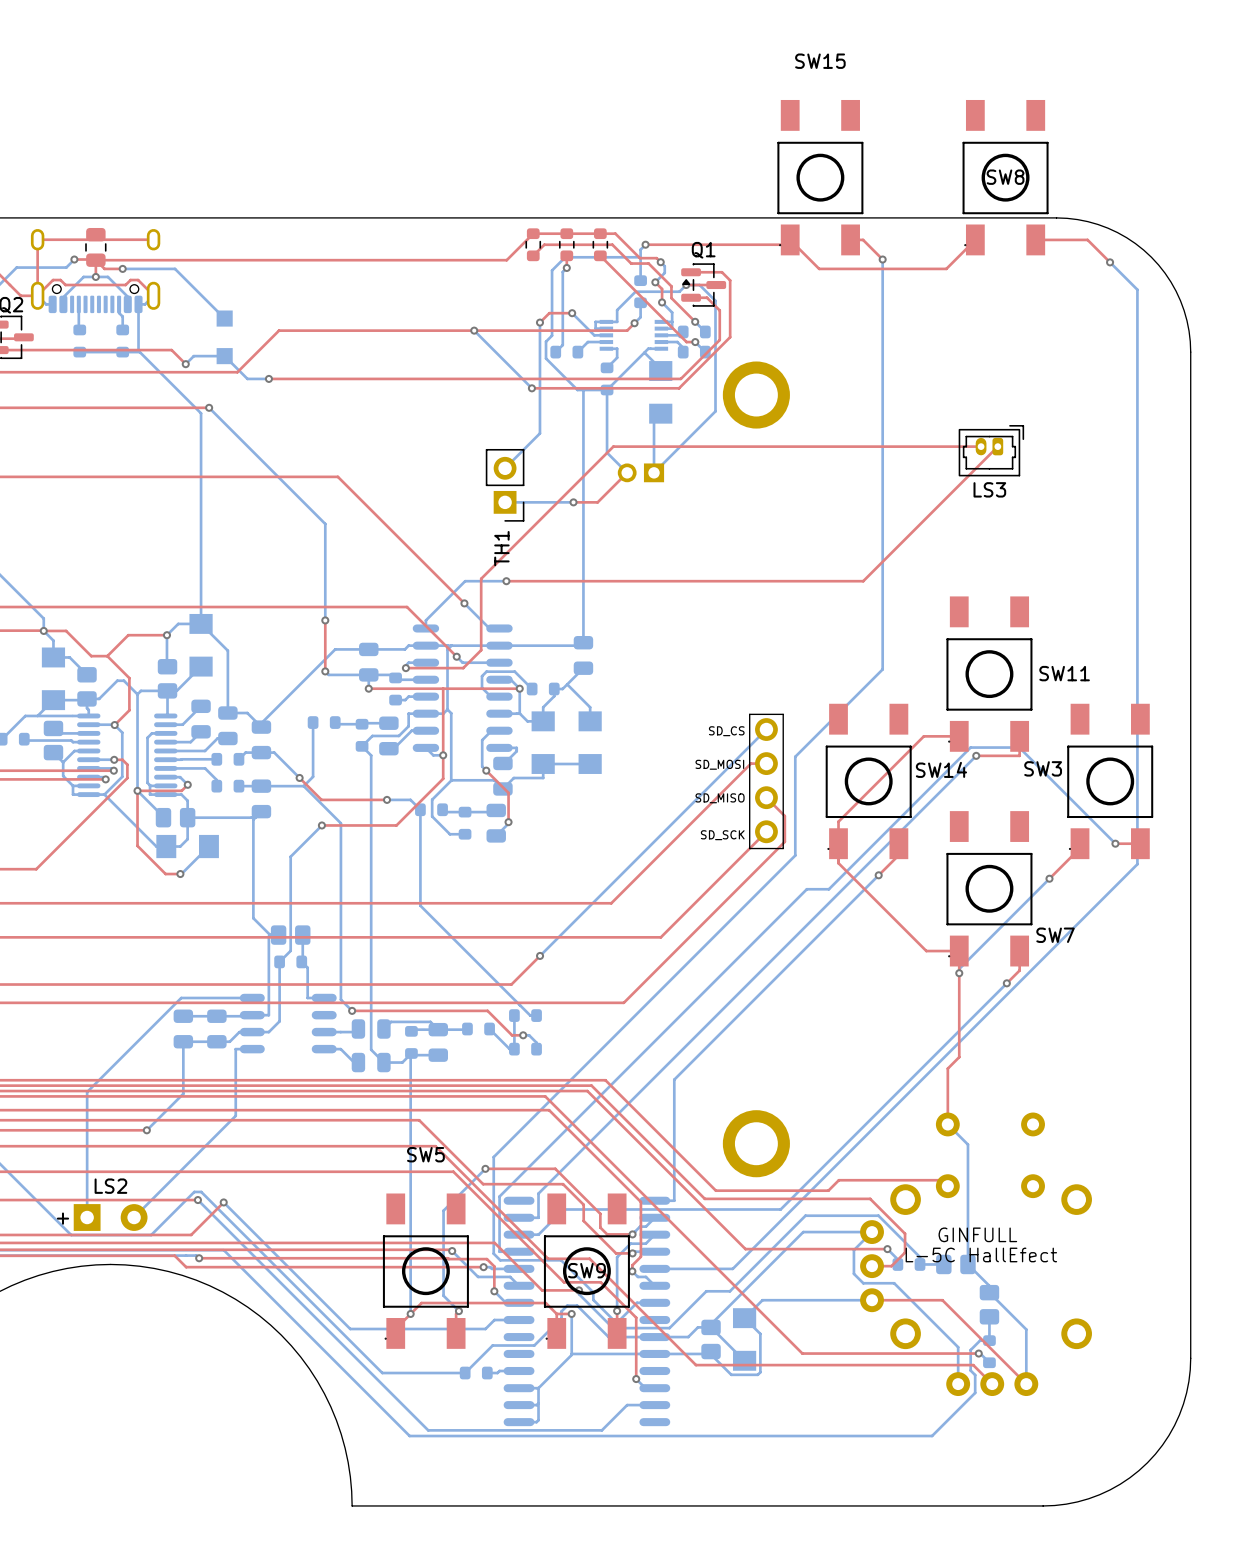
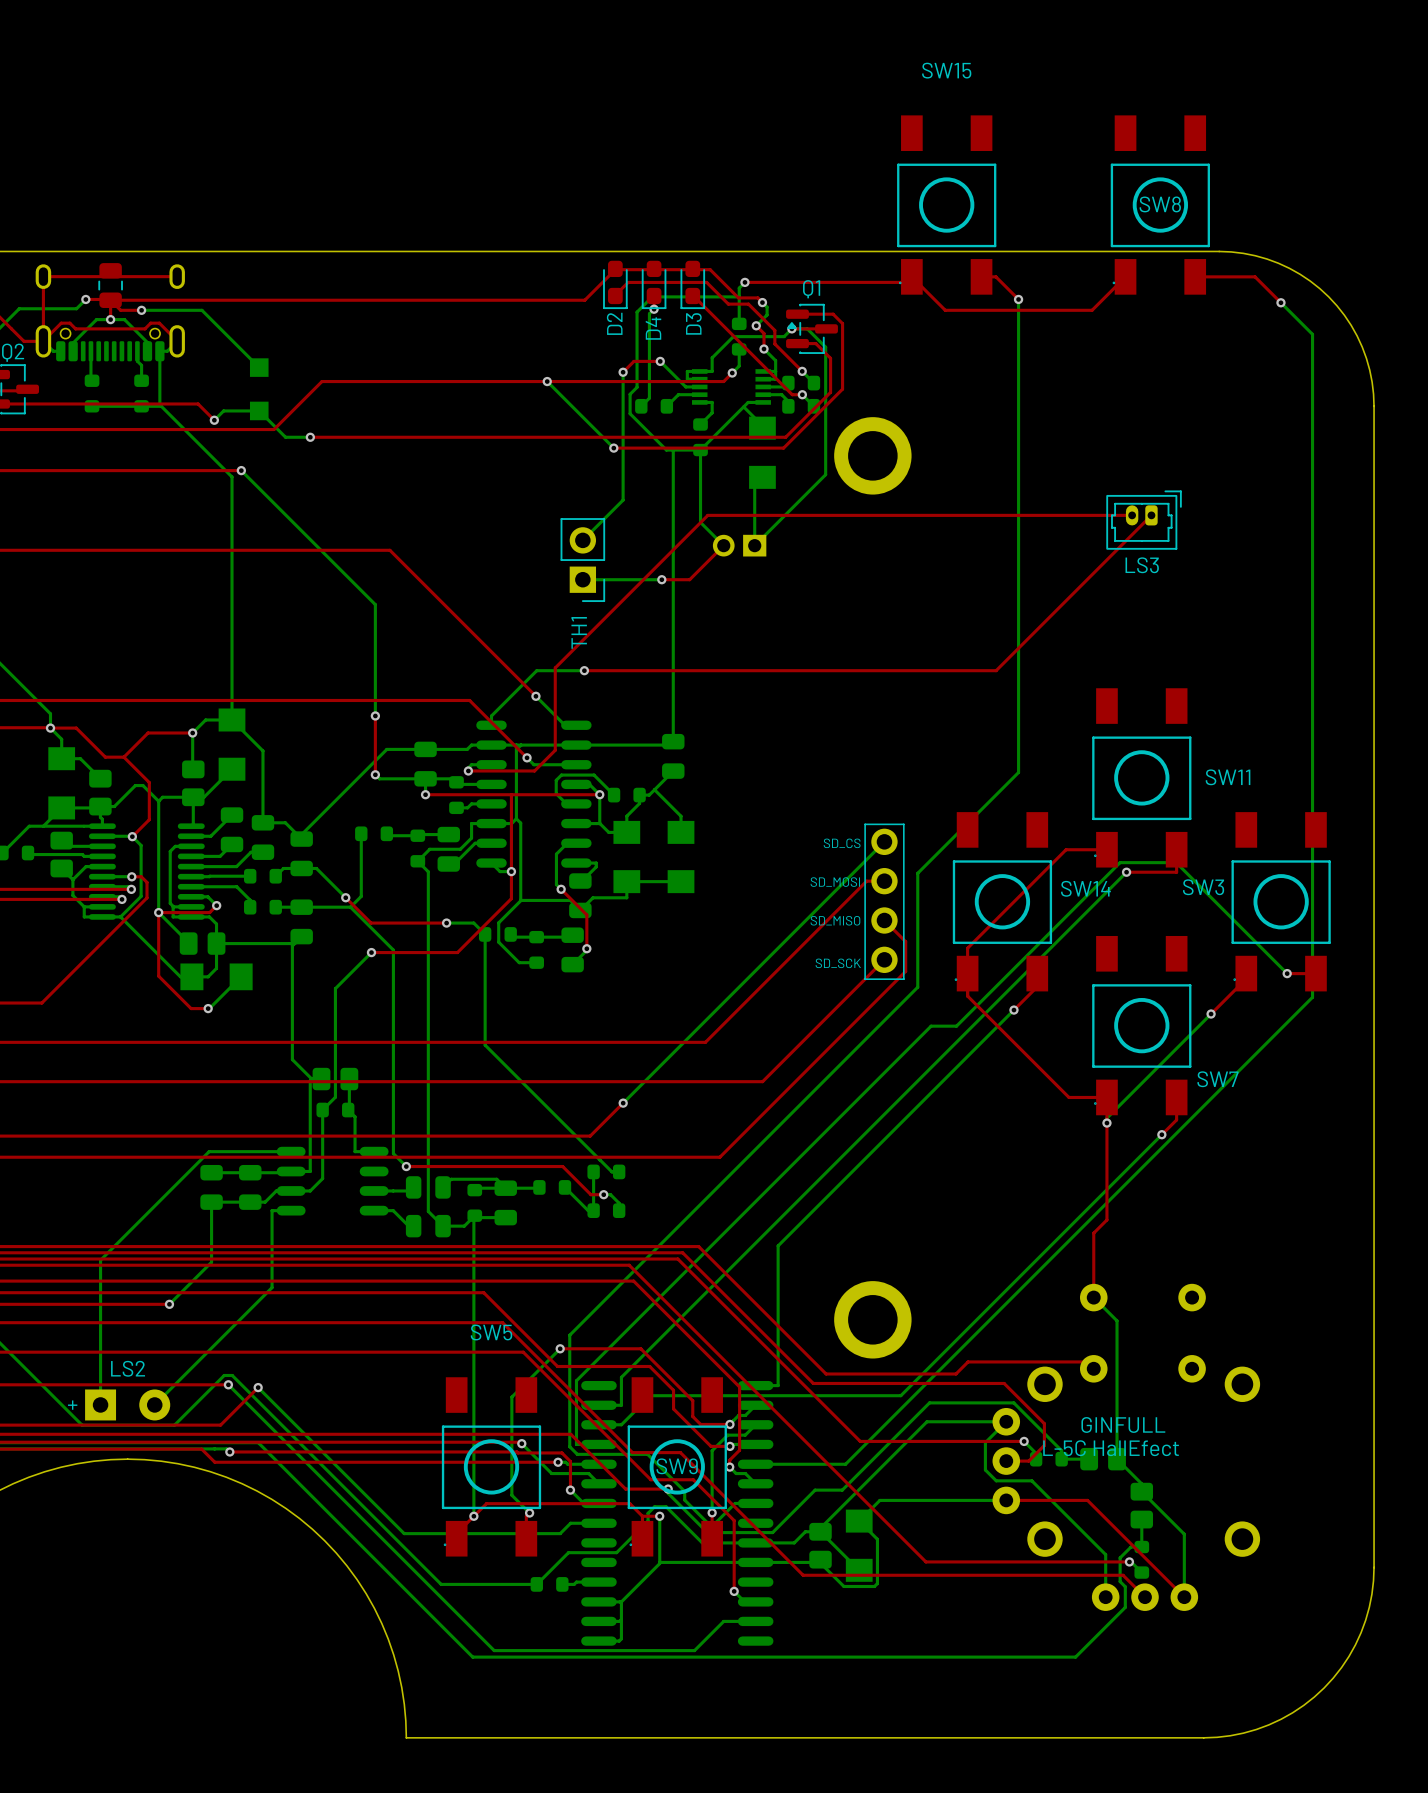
part: (533, 244) -> none
part: (566, 244) -> none
part: (600, 244) -> none
D2: none -> (615, 284)
D4: none -> (654, 284)
D3: none -> (692, 284)

